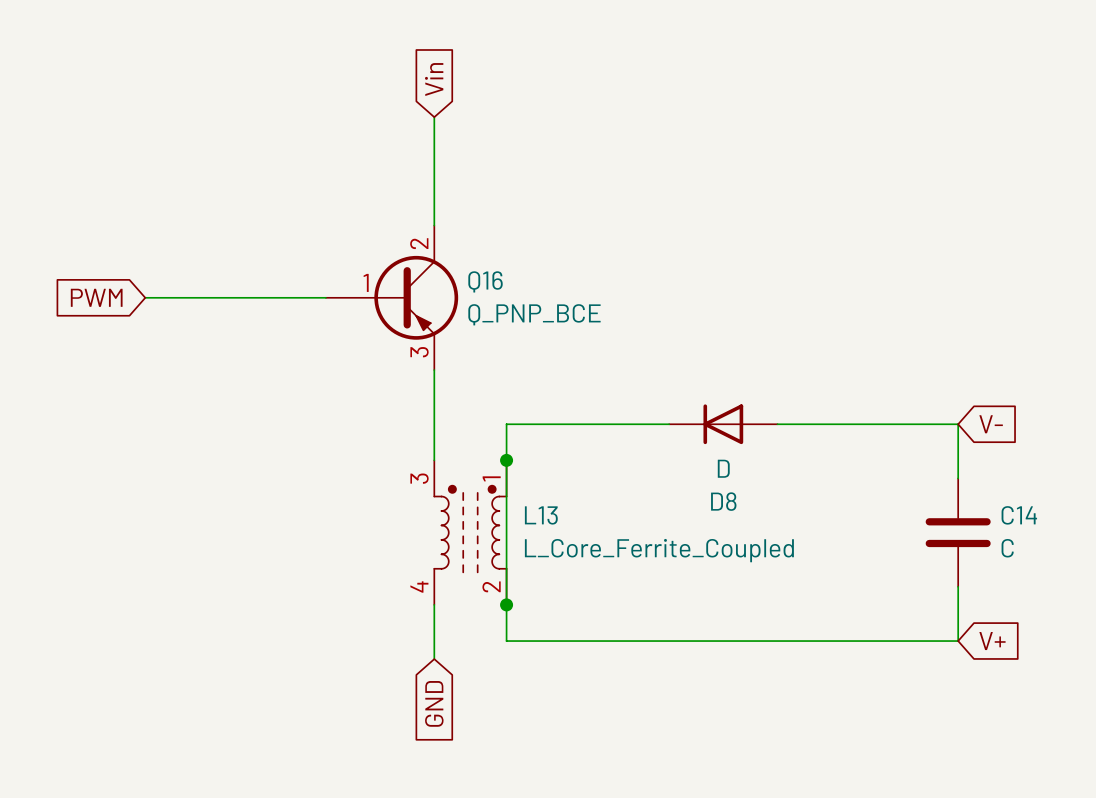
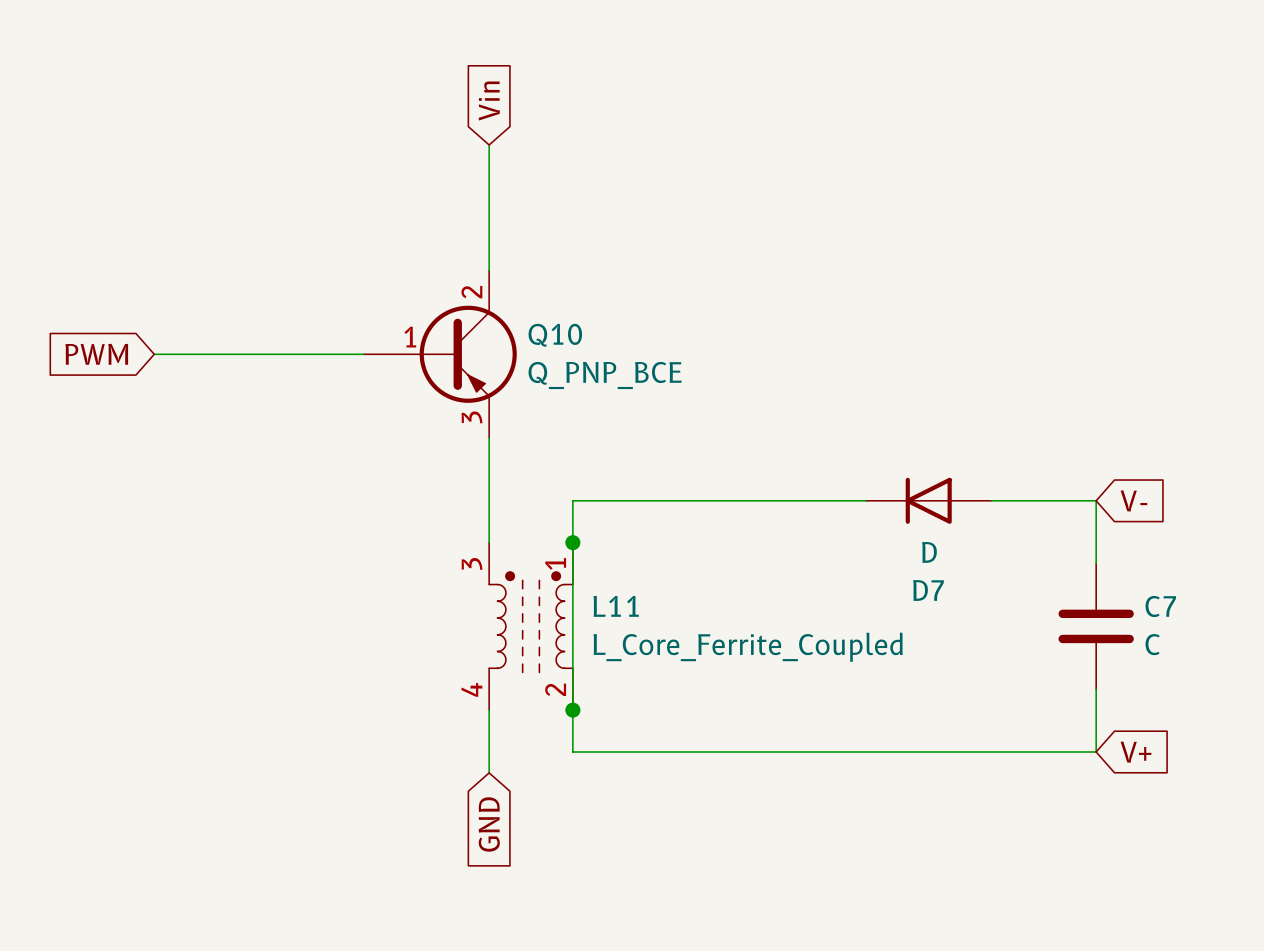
Q16 name: Q16 (485, 281) -> Q10 (555, 335)
D8: D (723, 424) -> none
D7: none -> D (928, 500)
L13 name: L13 (541, 515) -> L11 (616, 606)
C14 name: C14 (1019, 515) -> C7 (1160, 606)

